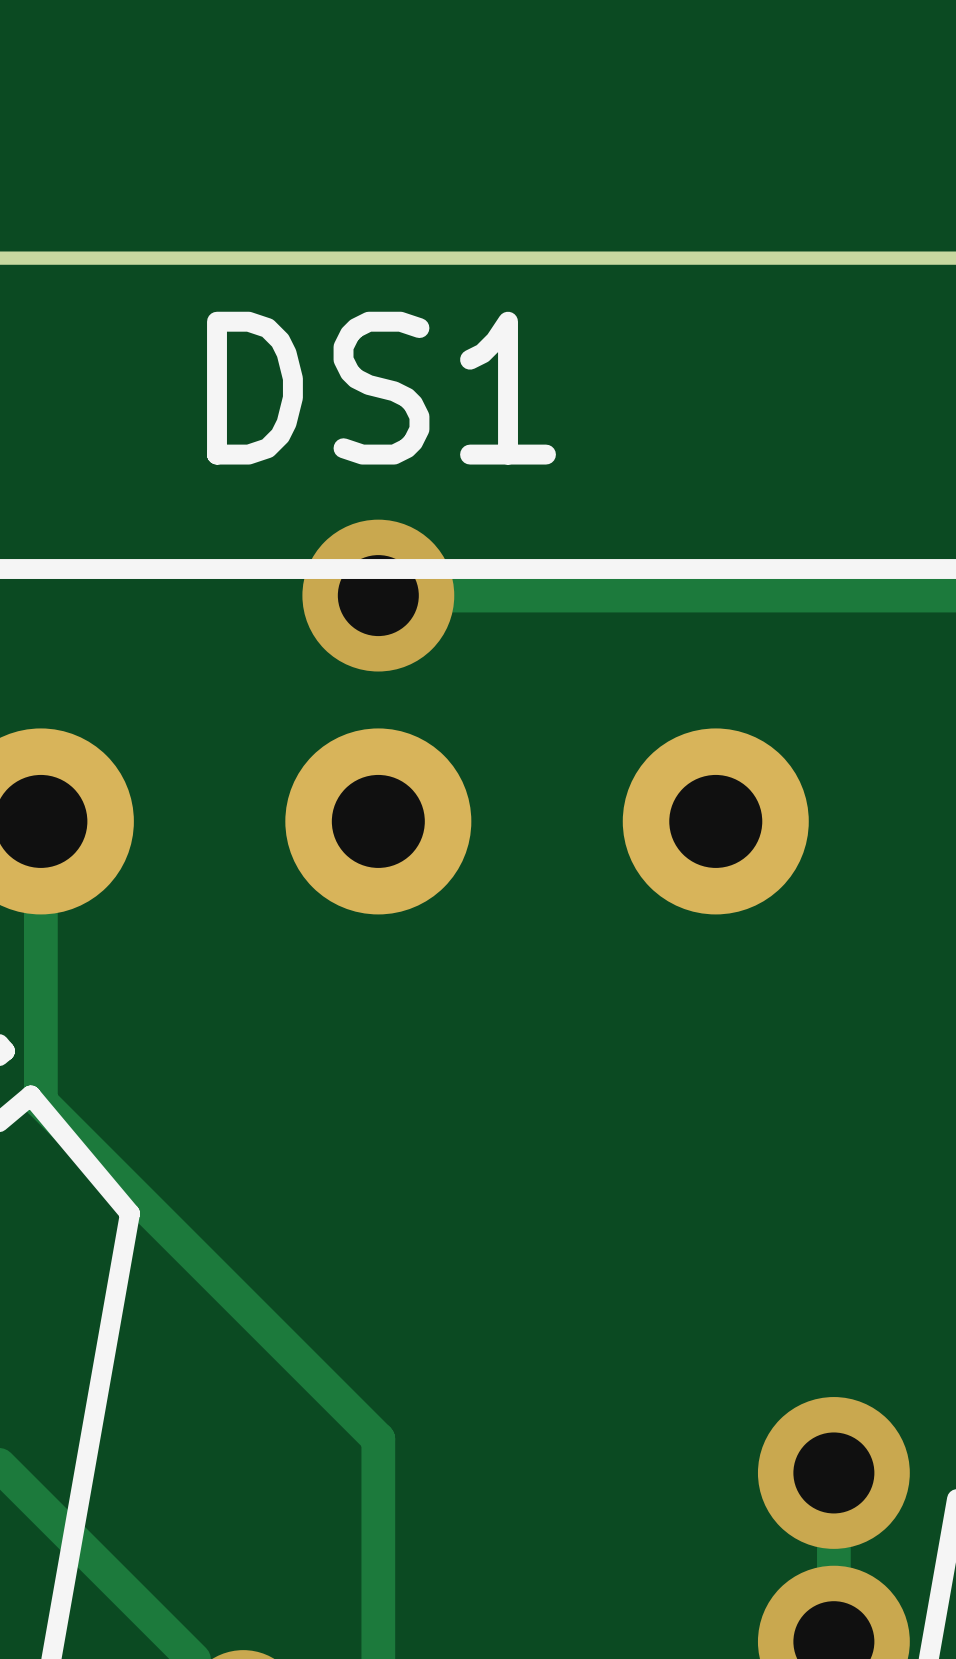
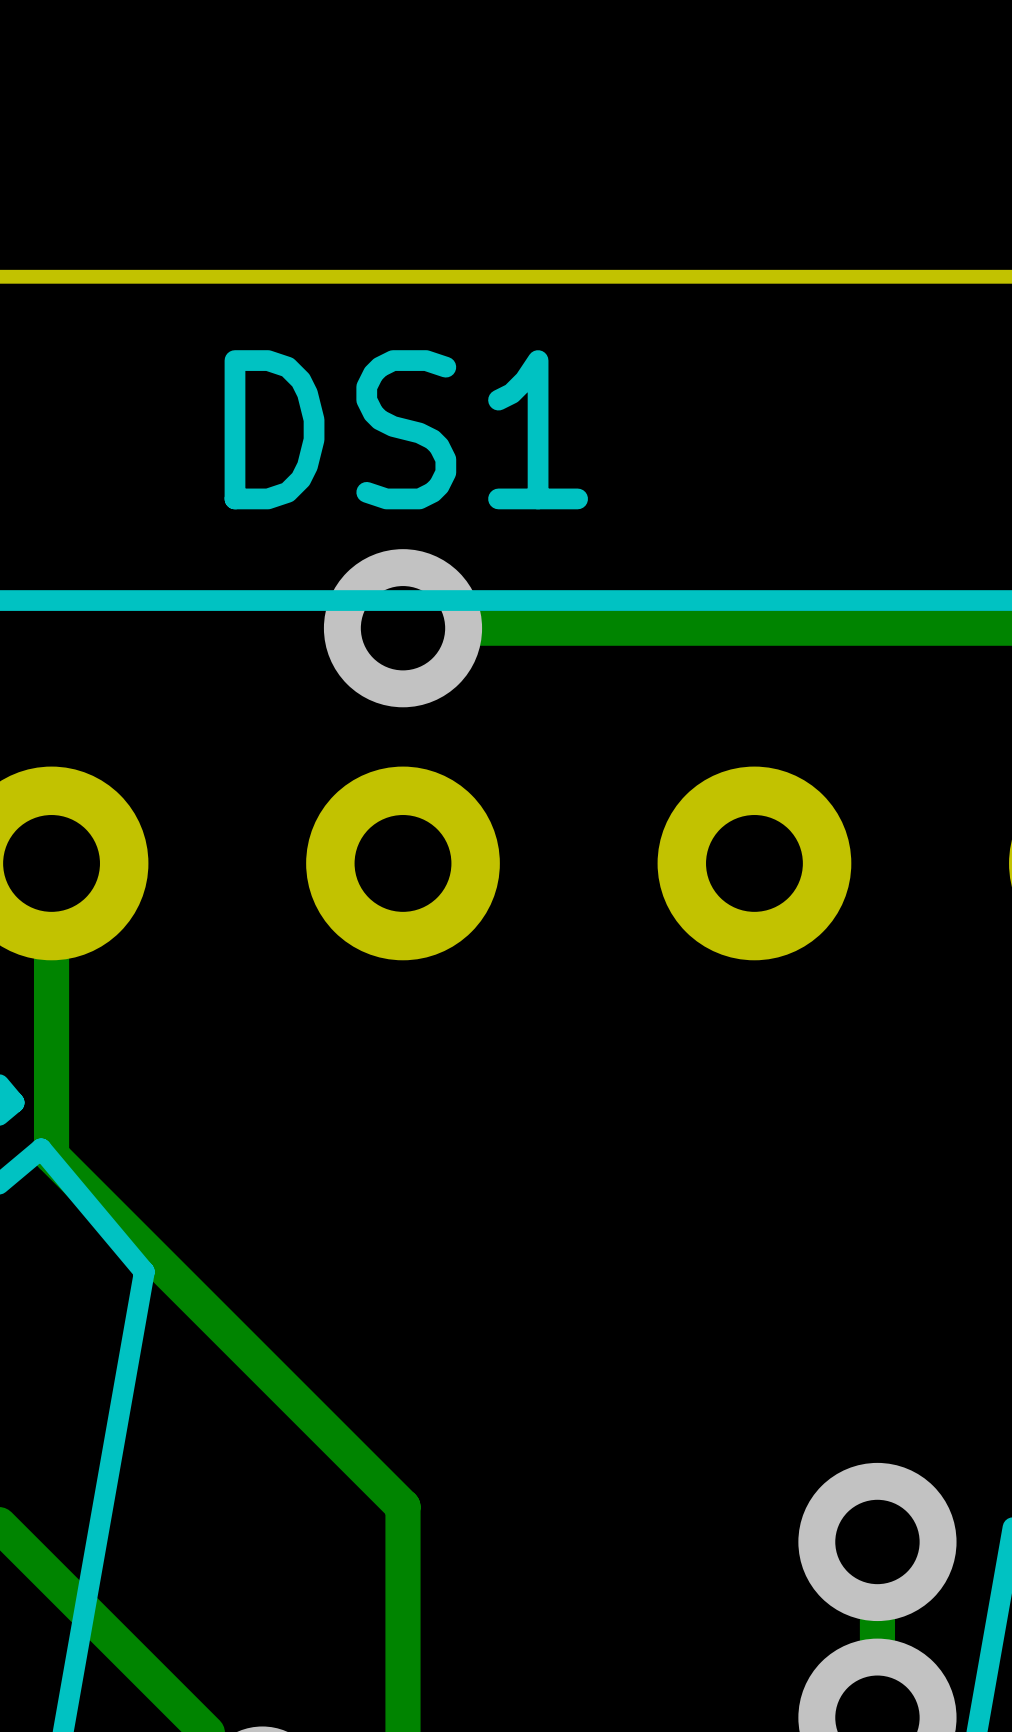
DS1 name position: DS1 (381, 388) -> DS1 (406, 429)

